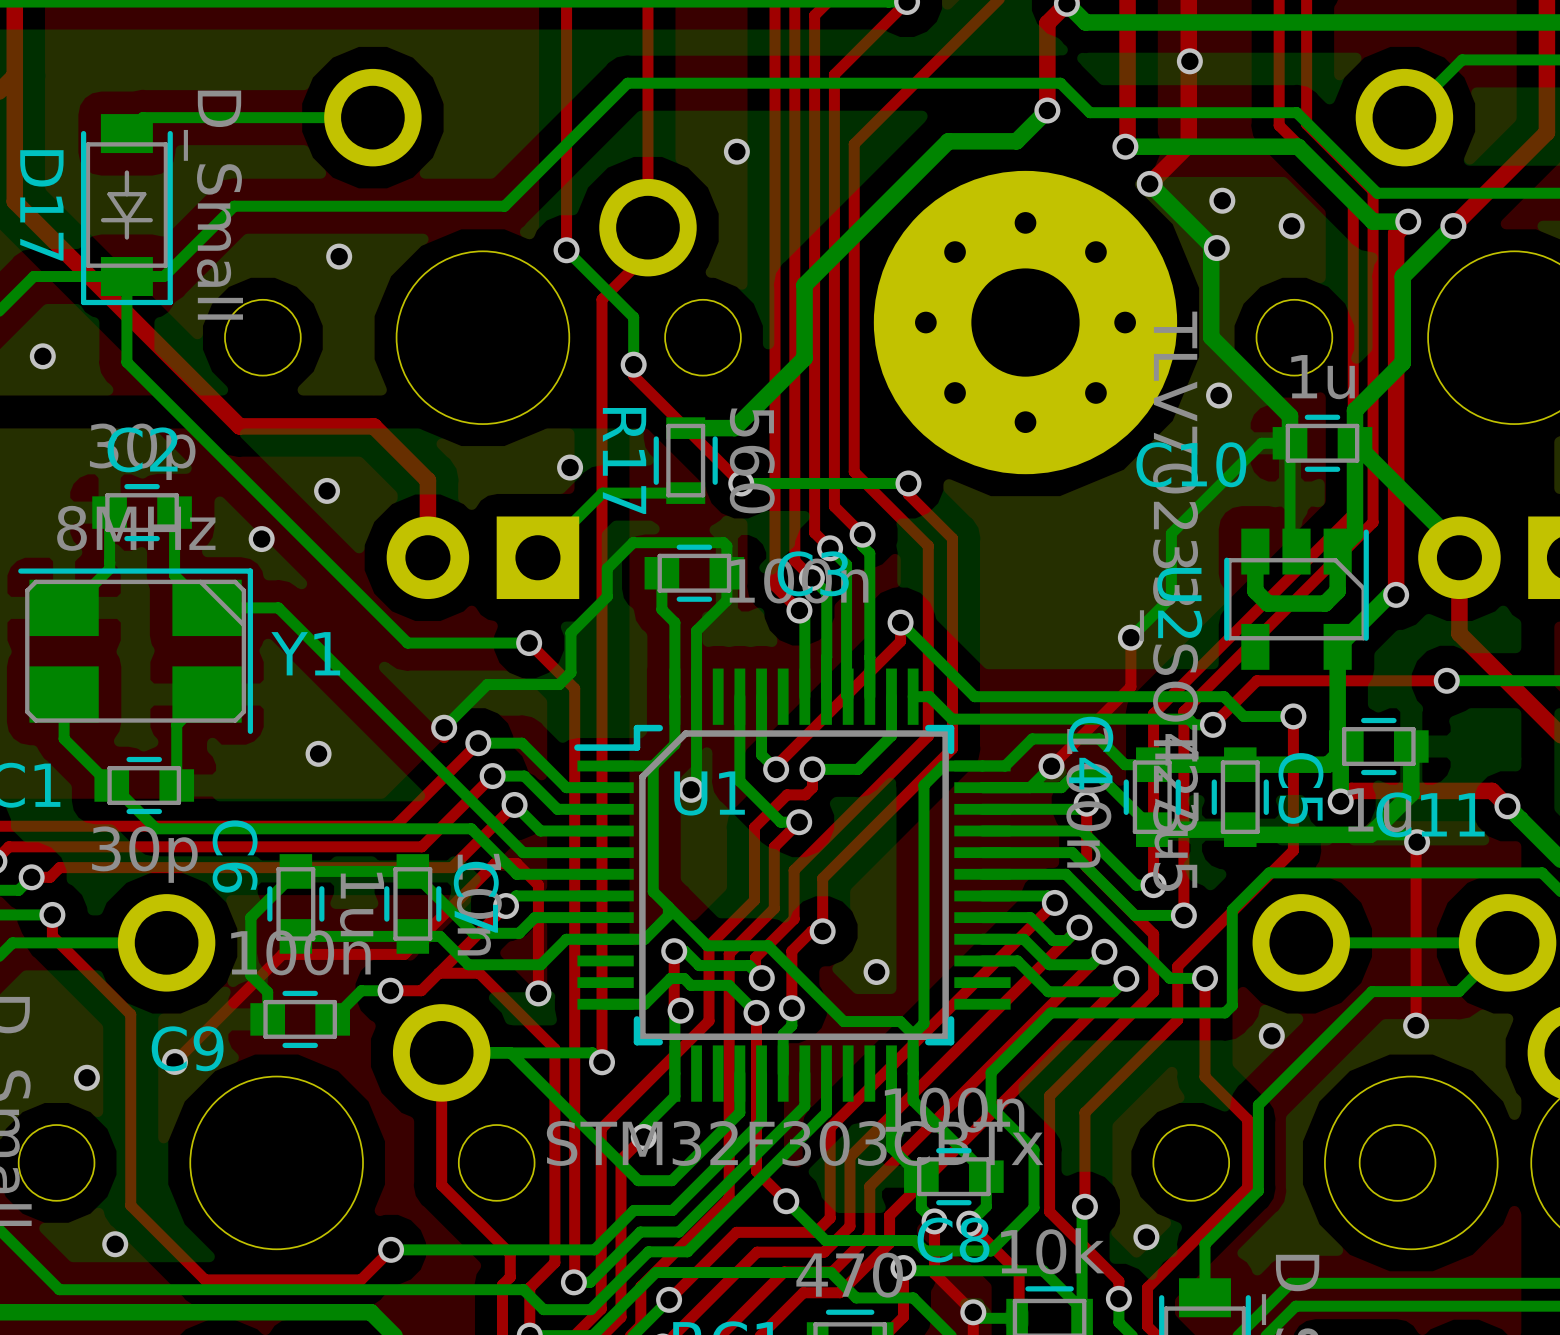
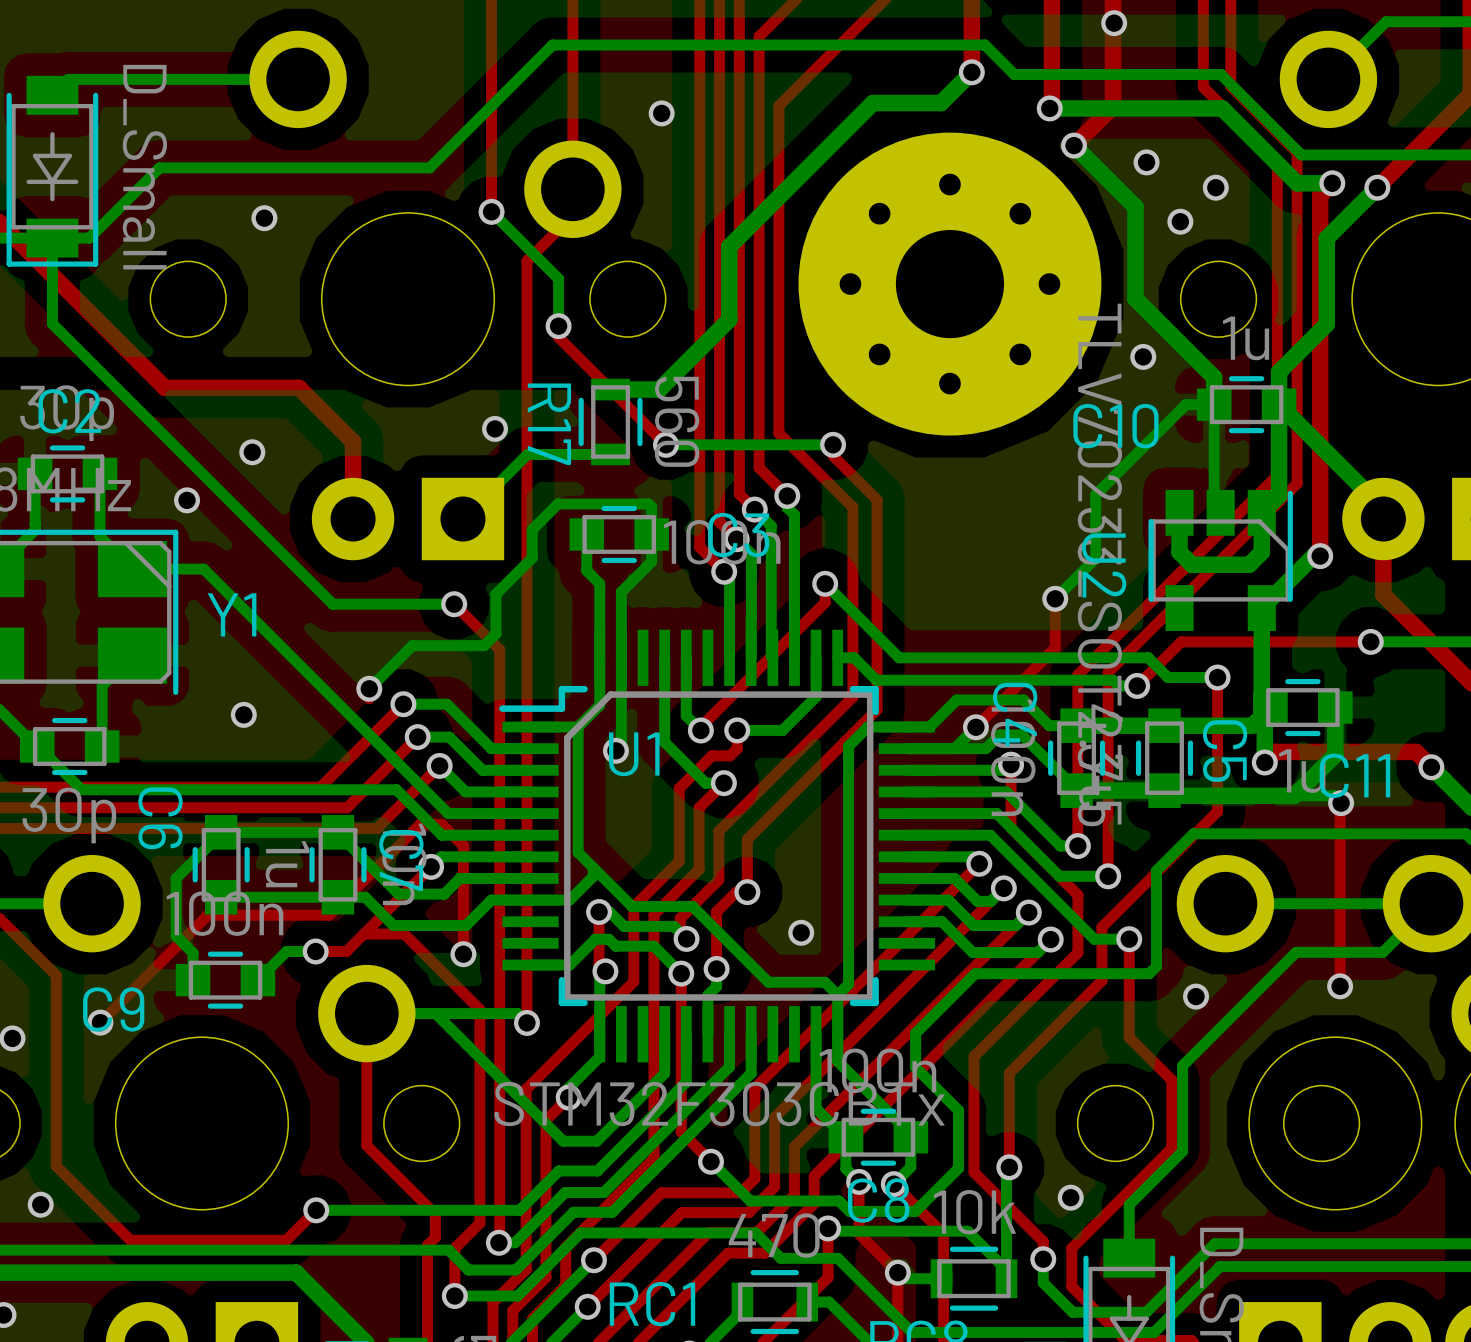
via position: (1216, 248) -> (1180, 221)

